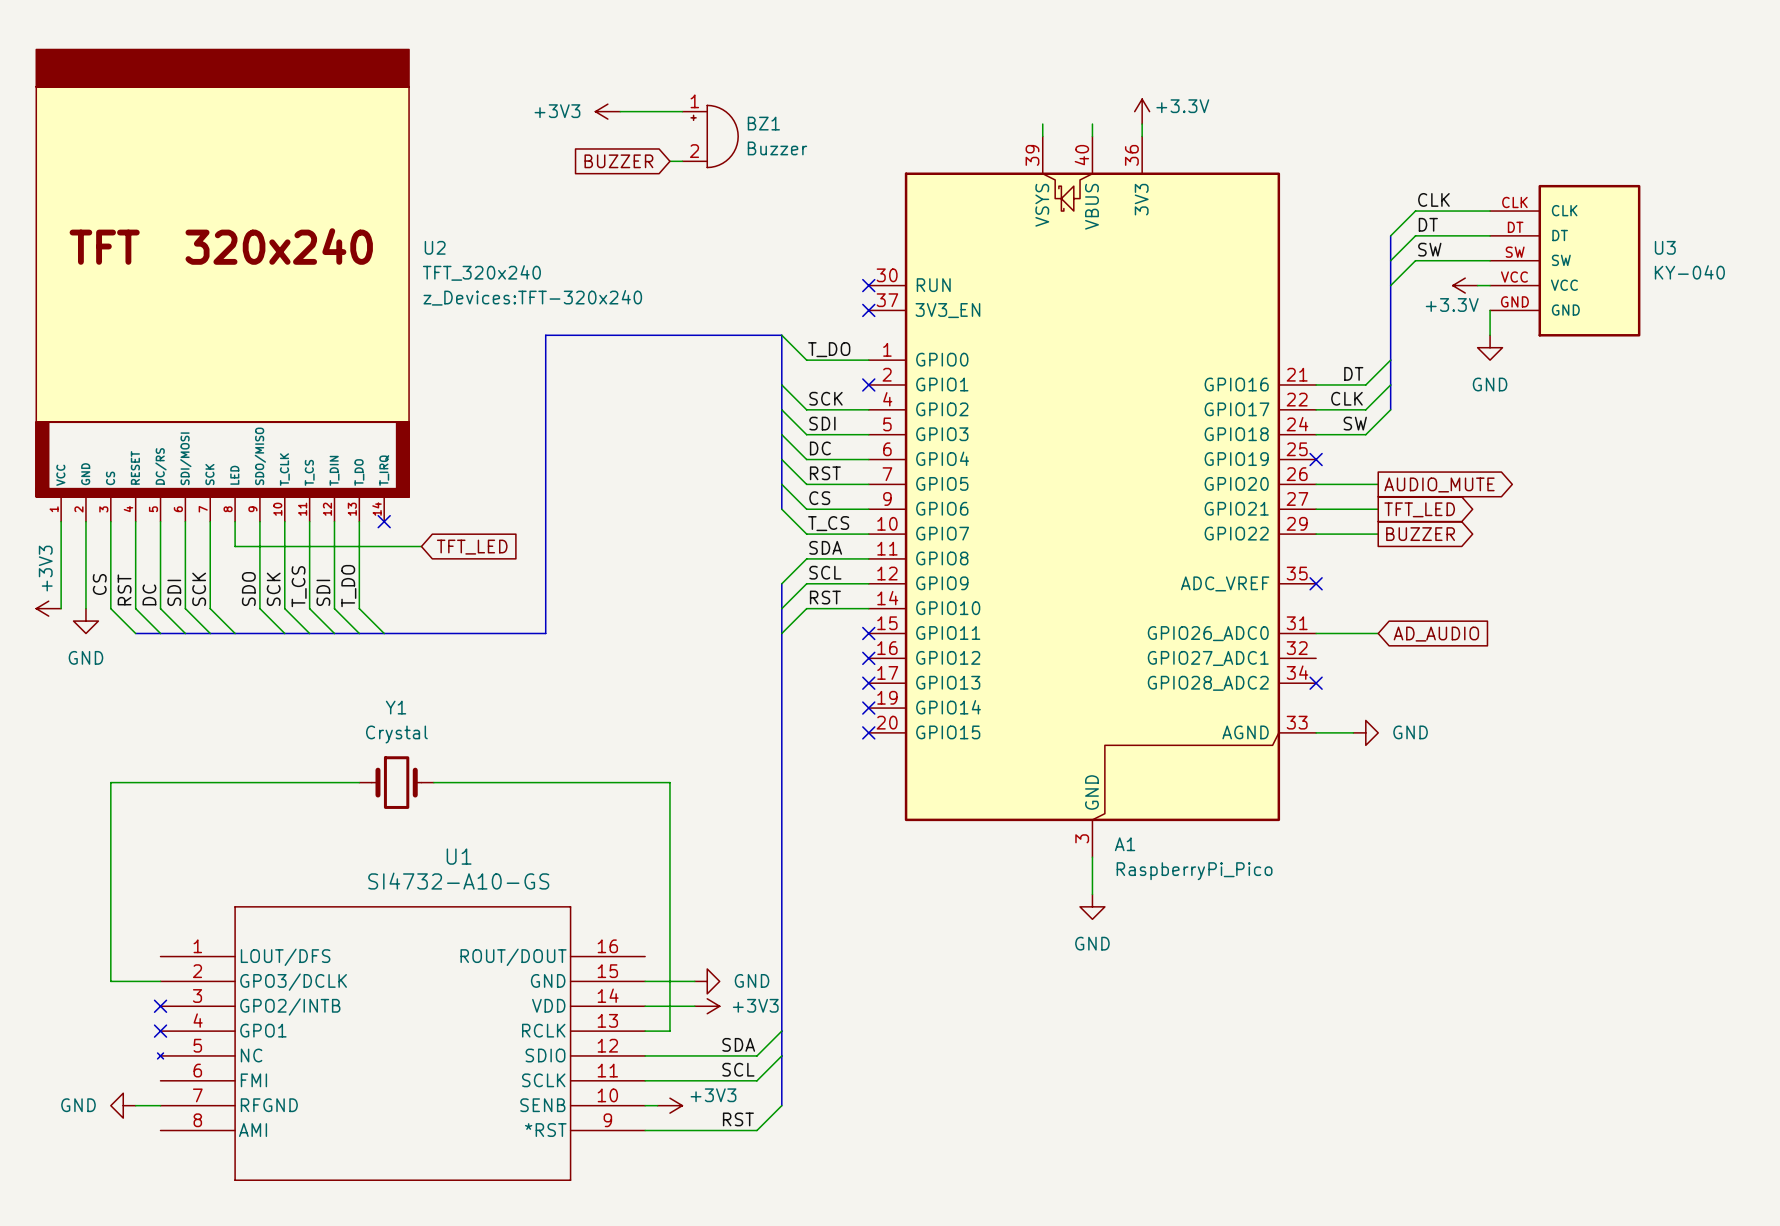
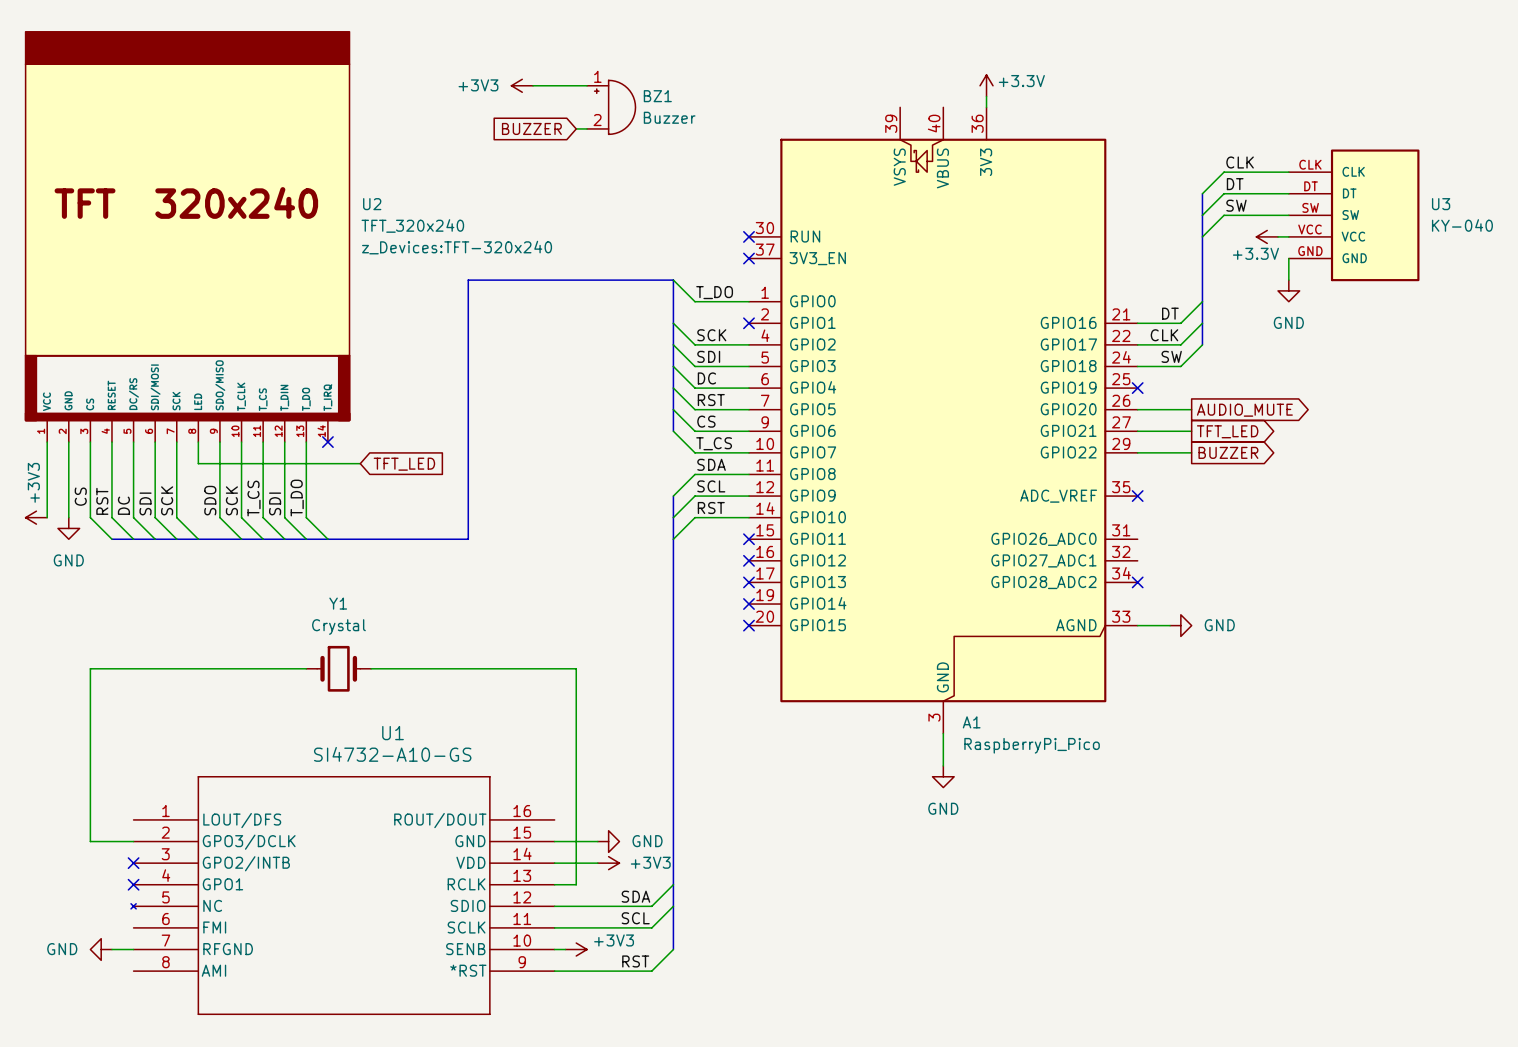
wire: (1042, 124) (1042, 136) -> none
wire: (1092, 124) (1092, 136) -> none
wire: (1316, 633) (1378, 633) -> none
global label: AD_AUDIO (1436, 634) -> none

